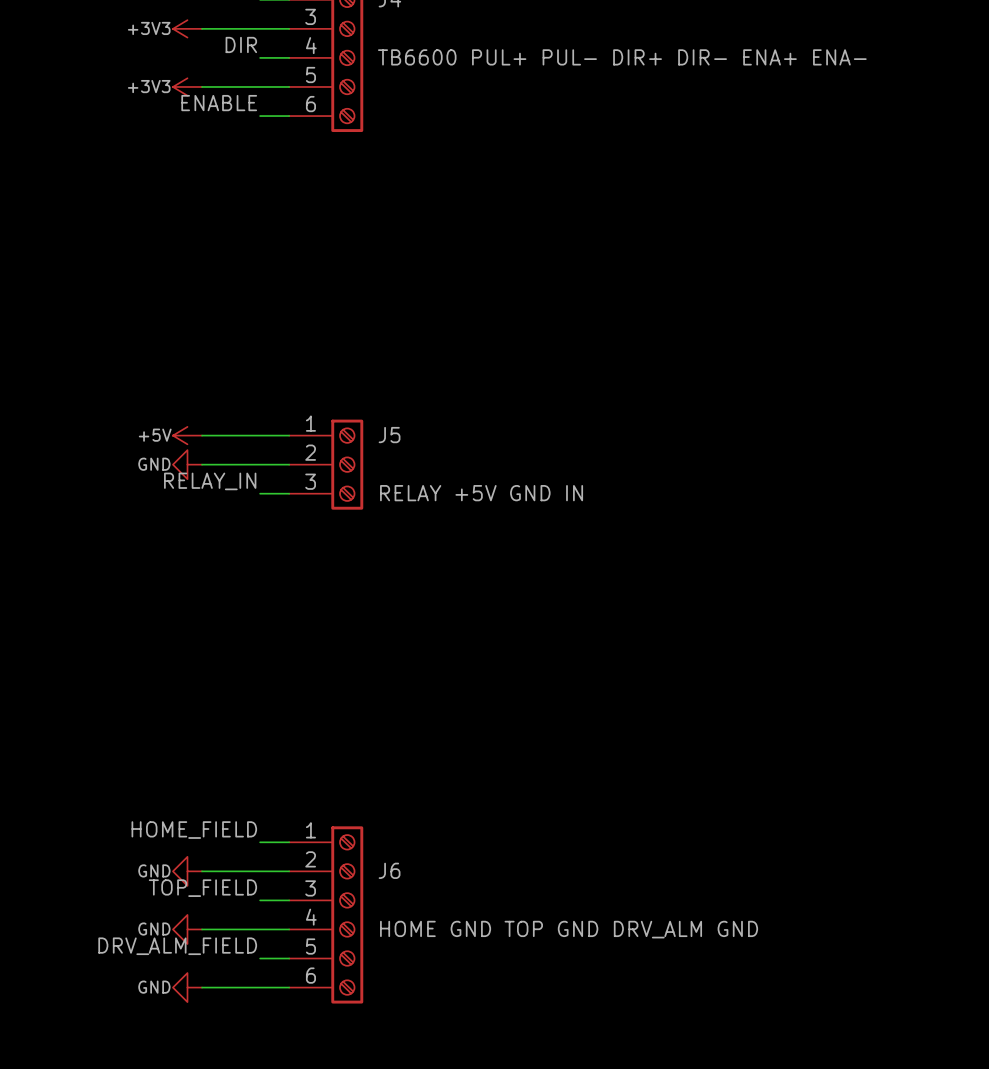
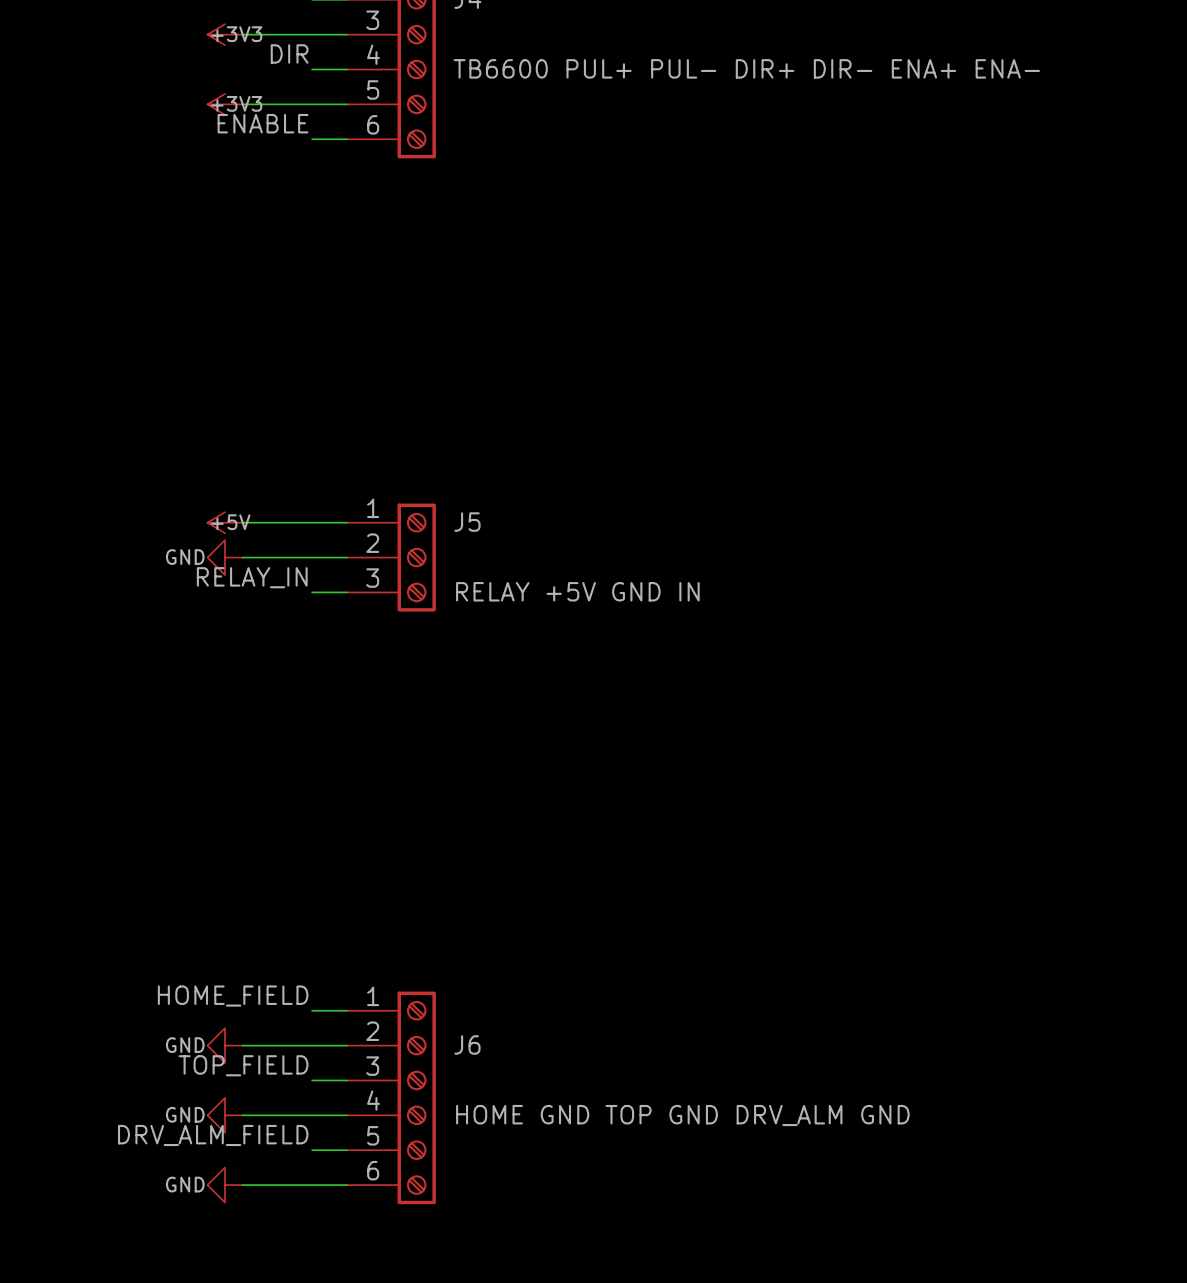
power symbol text position: +3V3 (149, 28) -> +3V3 (236, 34)
power symbol text position: +3V3 (149, 86) -> +3V3 (236, 103)
power symbol text position: +5V (155, 435) -> +5V (230, 522)

